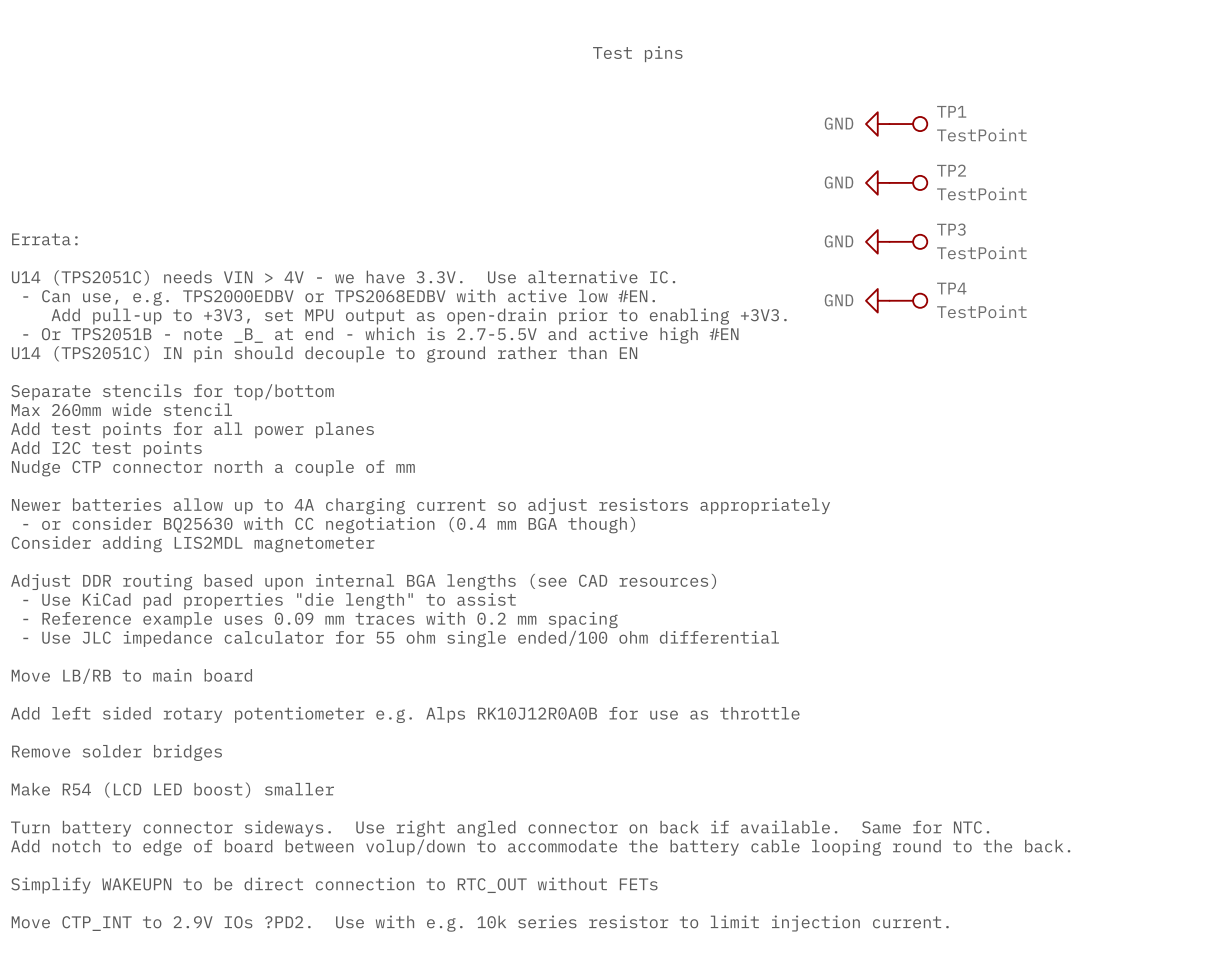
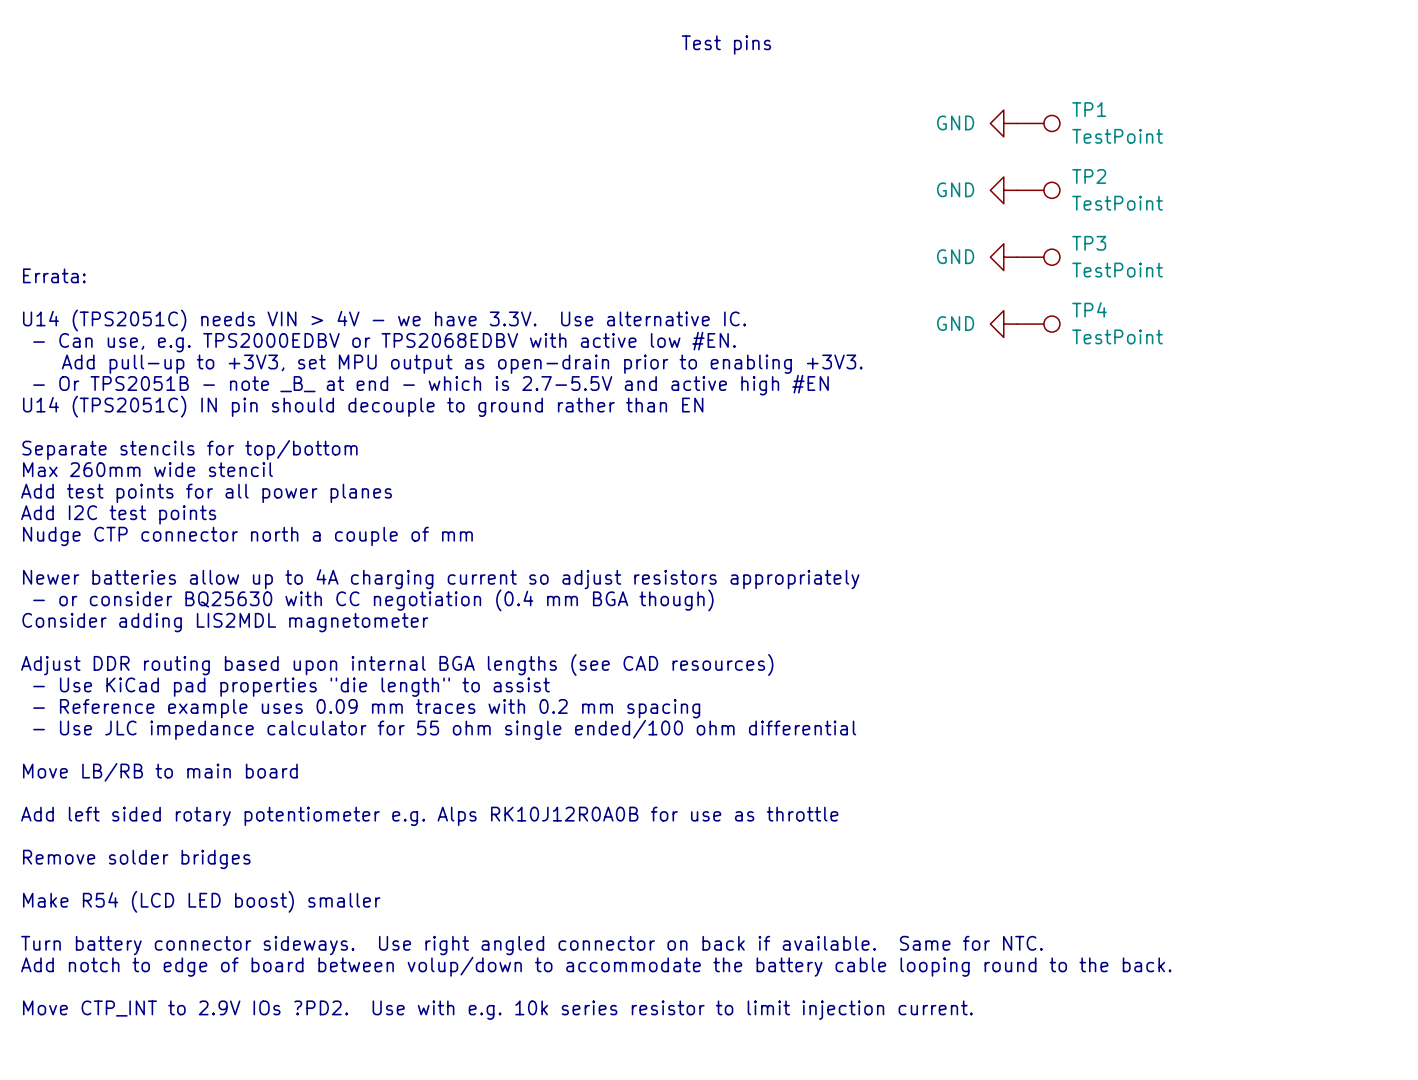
text position: Errata: (44, 239) -> Errata: (54, 275)
text: U14 (TPS2051C) needs VIN > 4V - we have 3.3V. Use alternative IC. (343, 277) -> none
text: - Can use, e.g. TPS2000EDBV or TPS2068EDBV with active low #EN. (339, 297) -> U14 (TPS2051C) needs VIN > 4V - we have 3.3V. Use alternative IC. (384, 320)
text: Add pull-up to +3V3, set MPU output as open-drain prior to enabling +3V3. (419, 316) -> - Can use, e.g. TPS2000EDBV or TPS2068EDBV with active low #EN. (384, 342)
text: - Or TPS2051B - note _B_ at end - which is 2.7-5.5V and active high #EN (380, 335) -> Add pull-up to +3V3, set MPU output as open-drain prior to enabling +3V3. (462, 364)
text: U14 (TPS2051C) IN pin should decouple to ground rather than EN (324, 354) -> - Or TPS2051B - note _B_ at end - which is 2.7-5.5V and active high #EN (431, 385)
text: none -> U14 (TPS2051C) IN pin should decouple to ground rather than EN (363, 406)
text: Separate stencils for top/bottom (172, 392) -> none
text: Max 260mm wide stencil (121, 409) -> Separate stencils for top/bottom (189, 450)
text: Add test points for all power planes (192, 430) -> Max 260mm wide stencil (147, 469)
text: Add I2C test points (106, 449) -> Add test points for all power planes (206, 493)
text: Nudge CTP connector north a couple of mm (213, 468) -> Add I2C test points (118, 514)
text: none -> Nudge CTP connector north a couple of mm (247, 536)
text: Newer batteries allow up to 4A charging current so adjust resistors appropriately (421, 506) -> none
text: - or consider BQ25630 with CC negotiation (0.4 mm BGA though) (329, 525) -> Newer batteries allow up to 4A charging current so adjust resistors appropriately (441, 579)
text: Consider adding LIS2MDL magnetometer (193, 544) -> - or consider BQ25630 with CC negotiation (0.4 mm BGA though) (373, 600)
text: none -> Consider adding LIS2MDL magnetometer (225, 622)
text: Adjust DDR routing based upon internal BGA lengths (see CAD resources) (363, 582) -> none
text: - Use KiCad pad properties "die length" to assist (269, 601) -> Adjust DDR routing based upon internal BGA lengths (see CAD resources) (397, 665)
text: - Reference example uses 0.09 mm traces with 0.2 mm spacing (320, 620) -> - Use KiCad pad properties "die length" to assist (291, 687)
text: - Use JLC impedance calculator for 55 ohm single ended/100 ohm differential (401, 638) -> - Reference example uses 0.09 mm traces with 0.2 mm spacing (366, 708)
text: none -> - Use JLC impedance calculator for 55 ohm single ended/100 ohm differential (444, 729)
text position: Move LB/RB to main board (131, 676) -> Move LB/RB to main board (160, 772)
text position: Add left sided rotary potentiometer e.g. Alps RK10J12R0A0B for use as throttle (405, 714) -> Add left sided rotary potentiometer e.g. Alps RK10J12R0A0B for use as throttle (429, 816)
text position: Remove solder bridges (117, 752) -> Remove solder bridges (136, 859)
text position: Make R54 (LCD LED boost) smaller (172, 790) -> Make R54 (LCD LED boost) smaller (201, 901)
text: Turn battery connector sideways. Use right angled connector on back if available. Same for NTC. (500, 828) -> none
text: Add notch to edge of board between volup/down to accommodate the battery cable looping round to the back. (540, 847) -> Turn battery connector sideways. Use right angled connector on back if available. Same for NTC. (531, 945)
text: none -> Add notch to edge of board between volup/down to accommodate the battery cable looping round to the back. (596, 966)
text: Simplify WAKEUPN to be direct connection to RTC_OUT without FETs (334, 885) -> none
text position: Move CTP_INT to 2.9V IOs ?PD2. Use with e.g. 10k series resistor to limit injection current. (480, 923) -> Move CTP_INT to 2.9V IOs ?PD2. Use with e.g. 10k series resistor to limit injection current. (497, 1010)

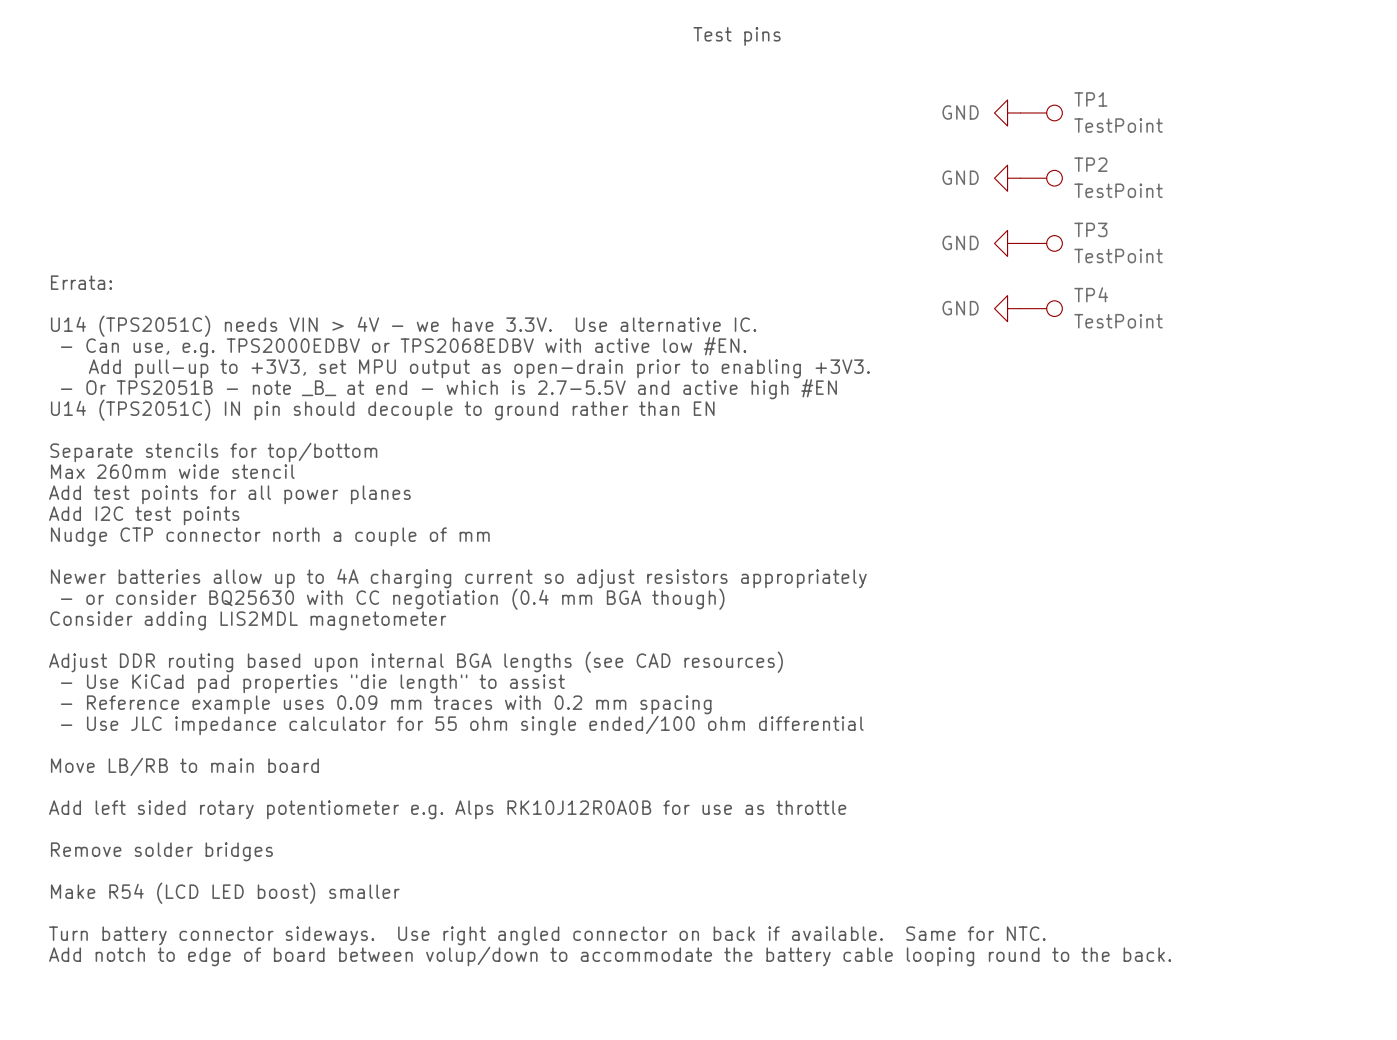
text position: Errata: (54, 275) -> Errata: (81, 282)
text: U14 (TPS2051C) needs VIN > 4V - we have 3.3V. Use alternative IC. (384, 320) -> none
text: - Can use, e.g. TPS2000EDBV or TPS2068EDBV with active low #EN. (384, 342) -> U14 (TPS2051C) needs VIN > 4V - we have 3.3V. Use alternative IC. (403, 326)
text: Add pull-up to +3V3, set MPU output as open-drain prior to enabling +3V3. (462, 364) -> - Can use, e.g. TPS2000EDBV or TPS2068EDBV with active low #EN. (403, 347)
text: - Or TPS2051B - note _B_ at end - which is 2.7-5.5V and active high #EN (431, 385) -> Add pull-up to +3V3, set MPU output as open-drain prior to enabling +3V3. (479, 368)
text: U14 (TPS2051C) IN pin should decouple to ground rather than EN (363, 406) -> - Or TPS2051B - note _B_ at end - which is 2.7-5.5V and active high #EN (448, 389)
text: none -> U14 (TPS2051C) IN pin should decouple to ground rather than EN (382, 410)
text: Separate stencils for top/bottom (189, 450) -> none
text: Max 260mm wide stencil (147, 469) -> Separate stencils for top/bottom (213, 452)
text: Add test points for all power planes (206, 493) -> Max 260mm wide stencil (172, 471)
text: Add I2C test points (118, 514) -> Add test points for all power planes (229, 494)
text: Nudge CTP connector north a couple of mm (247, 536) -> Add I2C test points (144, 515)
text: none -> Nudge CTP connector north a couple of mm (270, 536)
text: Newer batteries allow up to 4A charging current so adjust resistors appropriately (441, 579) -> none
text: - or consider BQ25630 with CC negotiation (0.4 mm BGA though) (373, 600) -> Newer batteries allow up to 4A charging current so adjust resistors appropriately (458, 578)
text: Consider adding LIS2MDL magnetometer (225, 622) -> - or consider BQ25630 with CC negotiation (0.4 mm BGA though) (392, 599)
text: none -> Consider adding LIS2MDL magnetometer (248, 620)
text: Adjust DDR routing based upon internal BGA lengths (see CAD resources) (397, 665) -> none
text: - Use KiCad pad properties "die length" to assist (291, 687) -> Adjust DDR routing based upon internal BGA lengths (see CAD resources) (415, 662)
text: - Reference example uses 0.09 mm traces with 0.2 mm spacing (366, 708) -> - Use KiCad pad properties "die length" to assist (312, 683)
text: - Use JLC impedance calculator for 55 ohm single ended/100 ohm differential (444, 729) -> - Reference example uses 0.09 mm traces with 0.2 mm spacing (386, 704)
text: none -> - Use JLC impedance calculator for 55 ohm single ended/100 ohm differential (462, 725)
text position: Move LB/RB to main board (160, 772) -> Move LB/RB to main board (184, 766)
text position: Add left sided rotary potentiometer e.g. Alps RK10J12R0A0B for use as throttle (429, 816) -> Add left sided rotary potentiometer e.g. Alps RK10J12R0A0B for use as throttle (447, 809)
text position: Remove solder bridges (136, 859) -> Remove solder bridges (161, 851)
text position: Make R54 (LCD LED boost) smaller (201, 901) -> Make R54 (LCD LED boost) smaller (225, 893)
text: Turn battery connector sideways. Use right angled connector on back if available. Same for NTC. (531, 945) -> none
text: Add notch to edge of board between volup/down to accommodate the battery cable looping round to the back. (596, 966) -> Turn battery connector sideways. Use right angled connector on back if available. Same for NTC. (547, 935)
text: none -> Add notch to edge of board between volup/down to accommodate the battery cable looping round to the back. (610, 956)
text: Move CTP_INT to 2.9V IOs ?PD2. Use with e.g. 10k series resistor to limit injection current. (497, 1010) -> none

